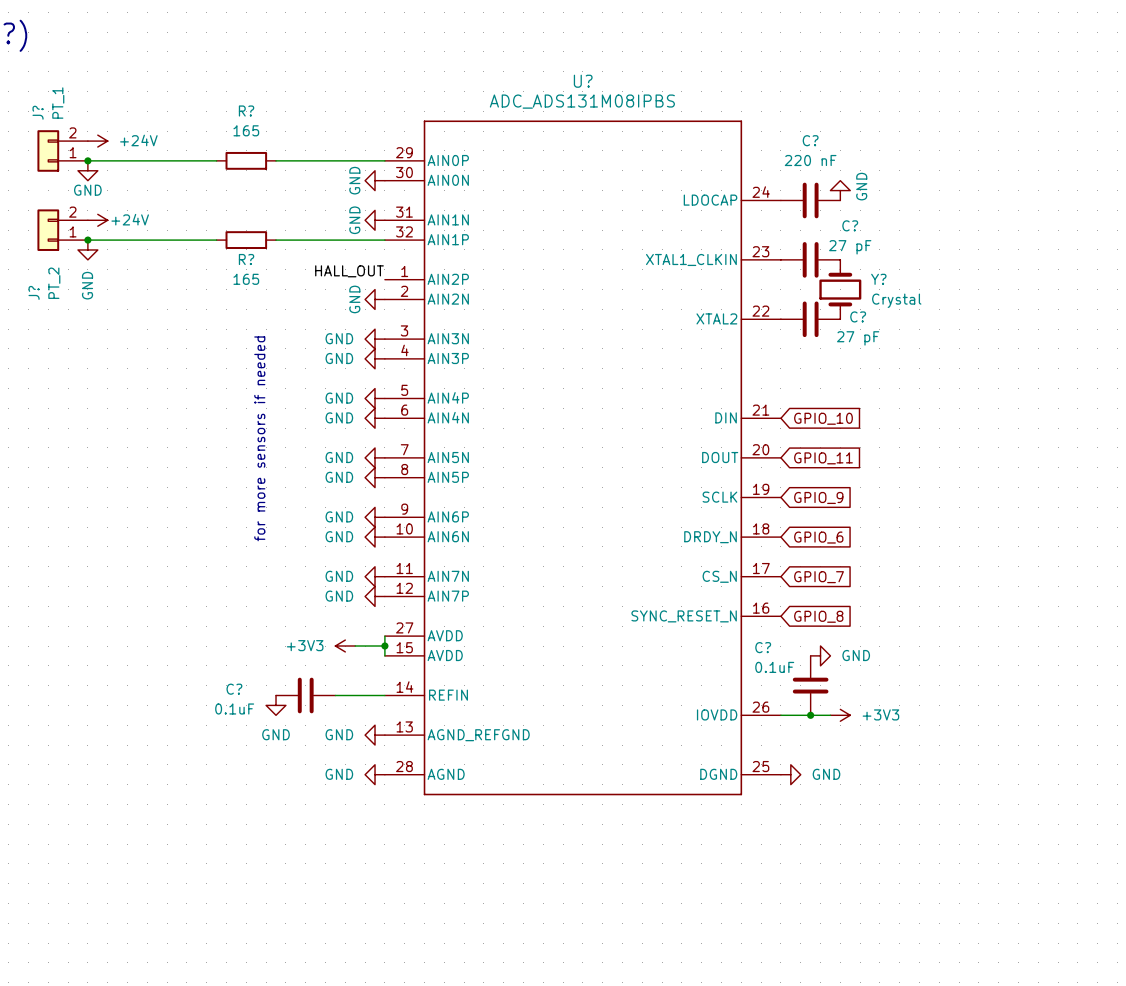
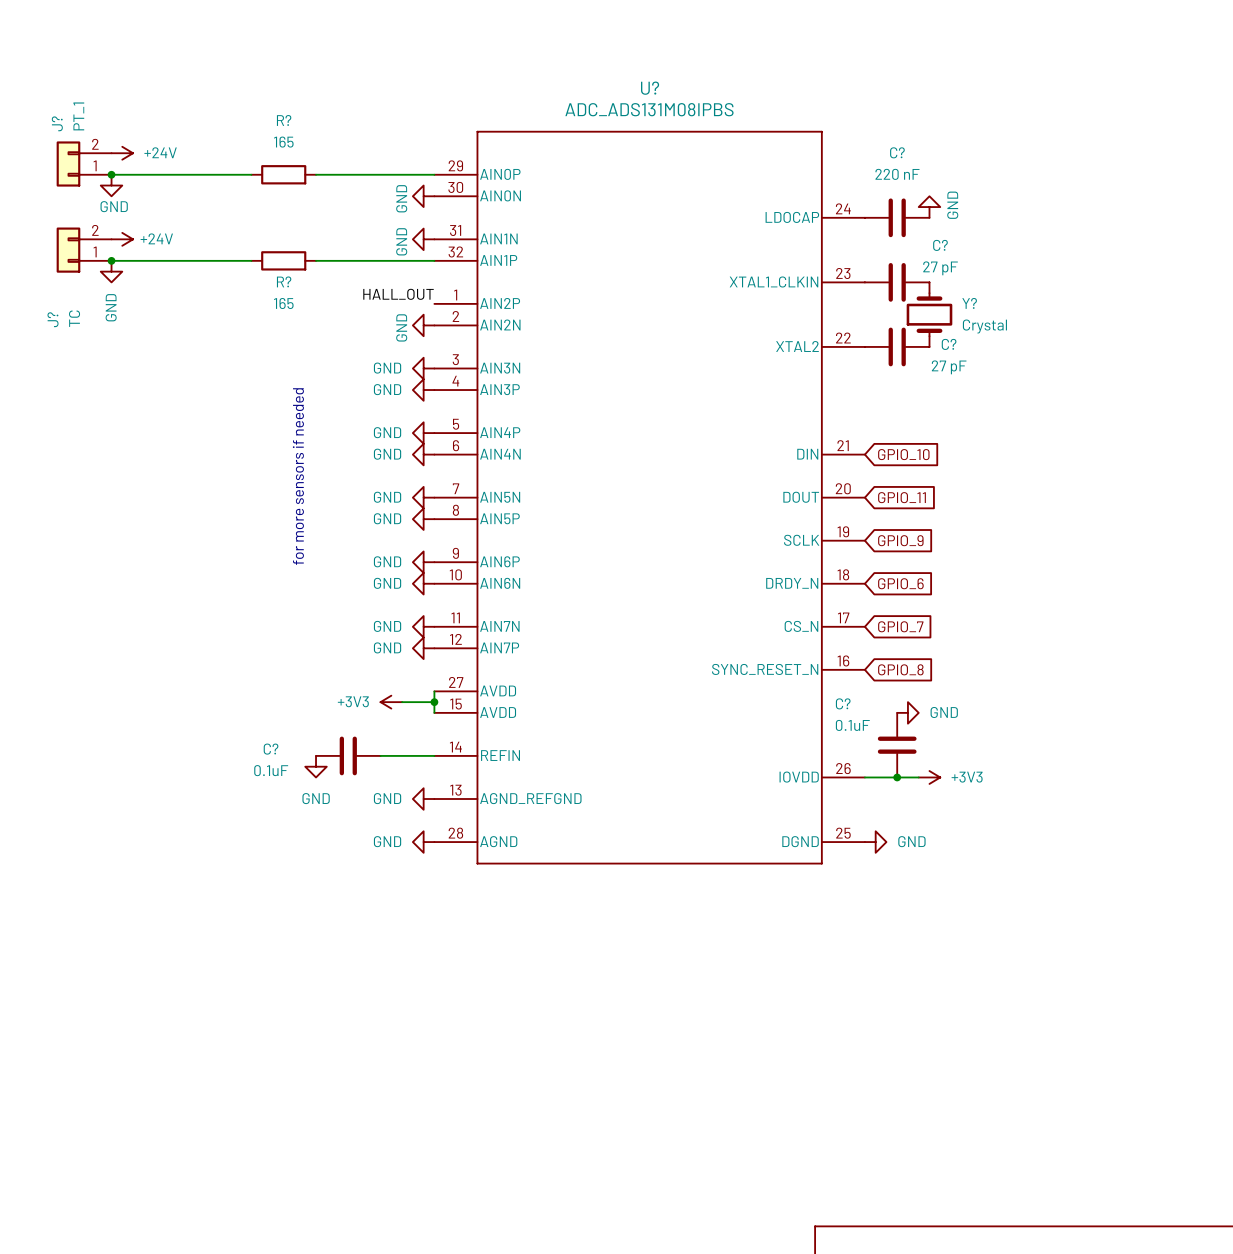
J? value: PT_2 (54, 283) -> TC (74, 318)

